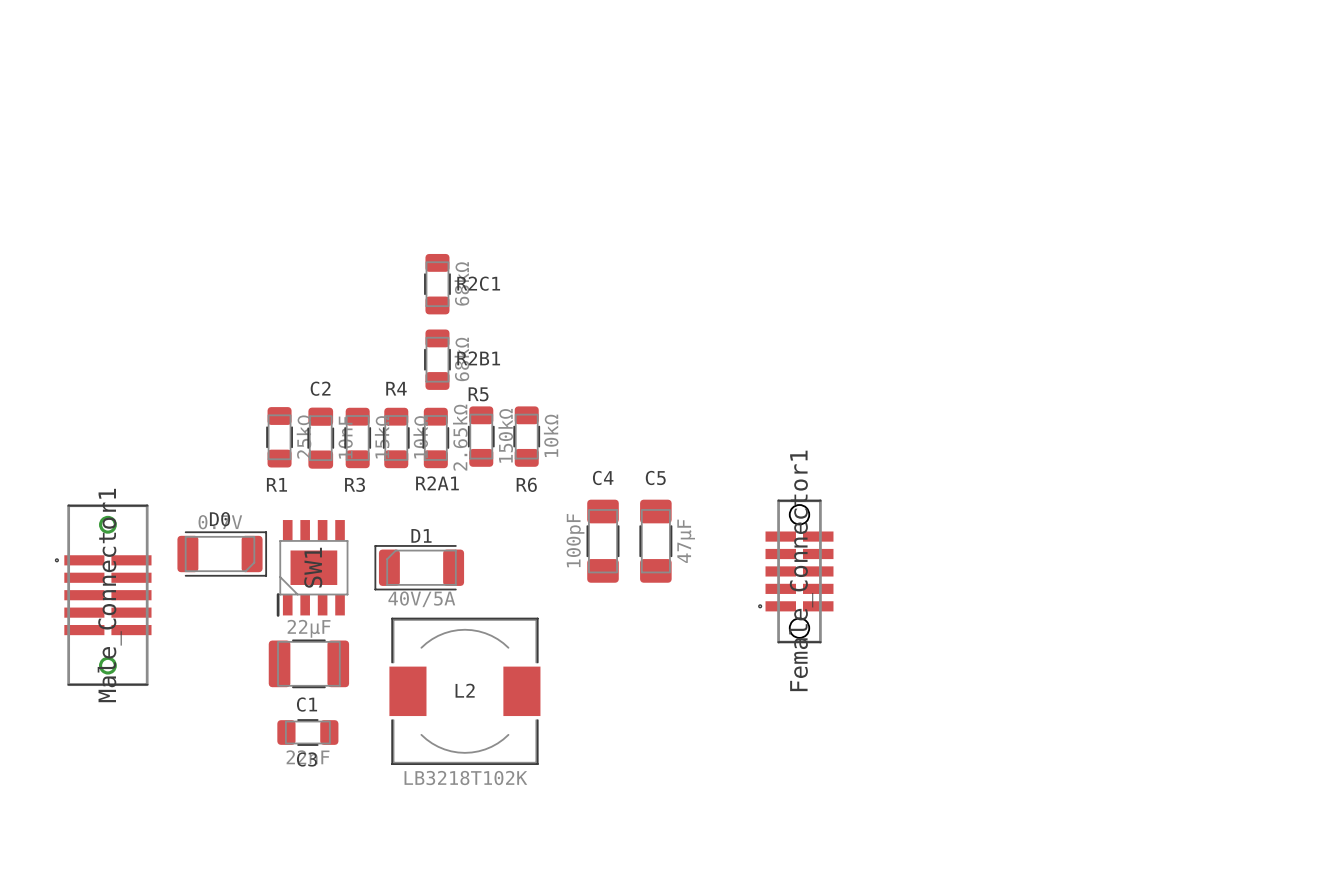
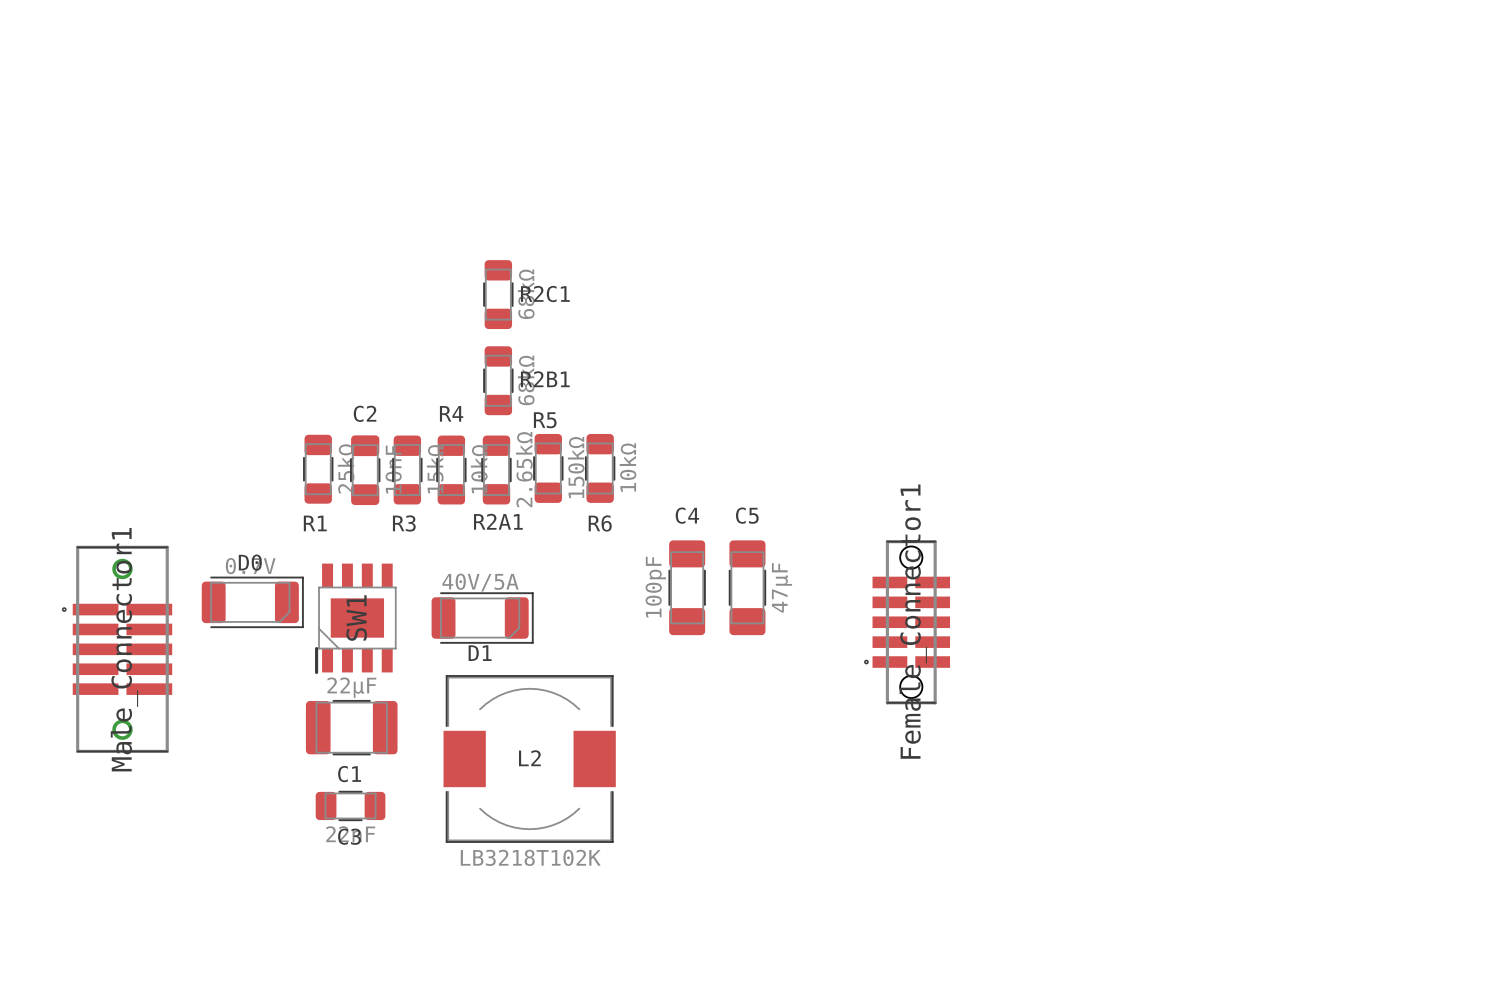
D1 rotation: 0° (419, 567) -> 180° (482, 618)

